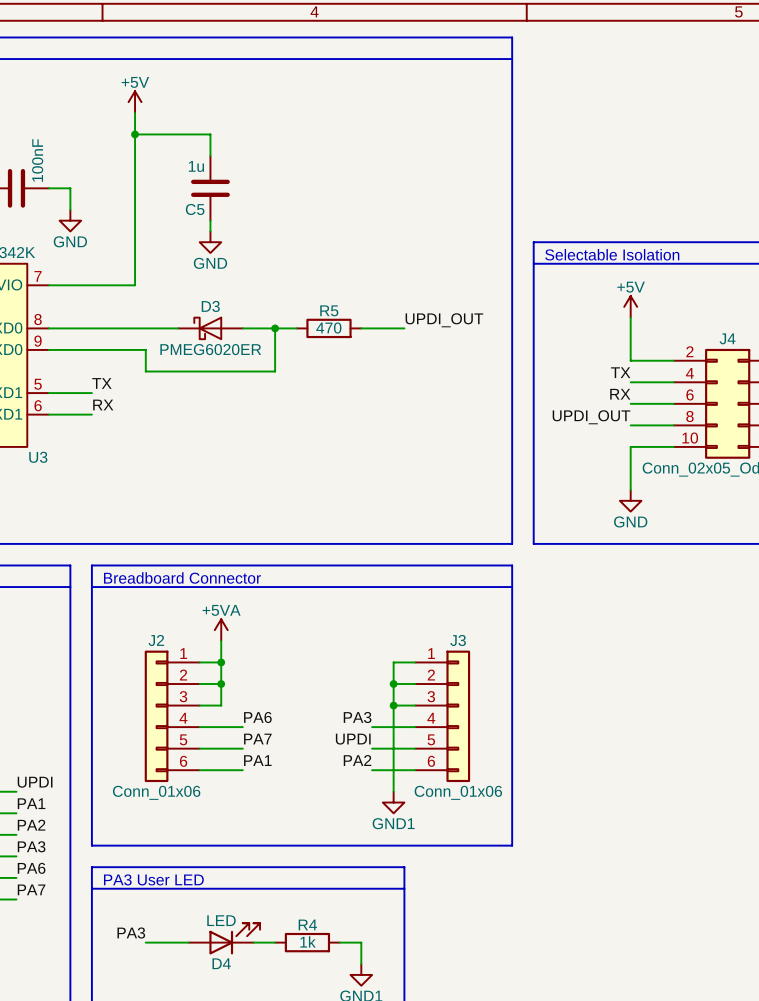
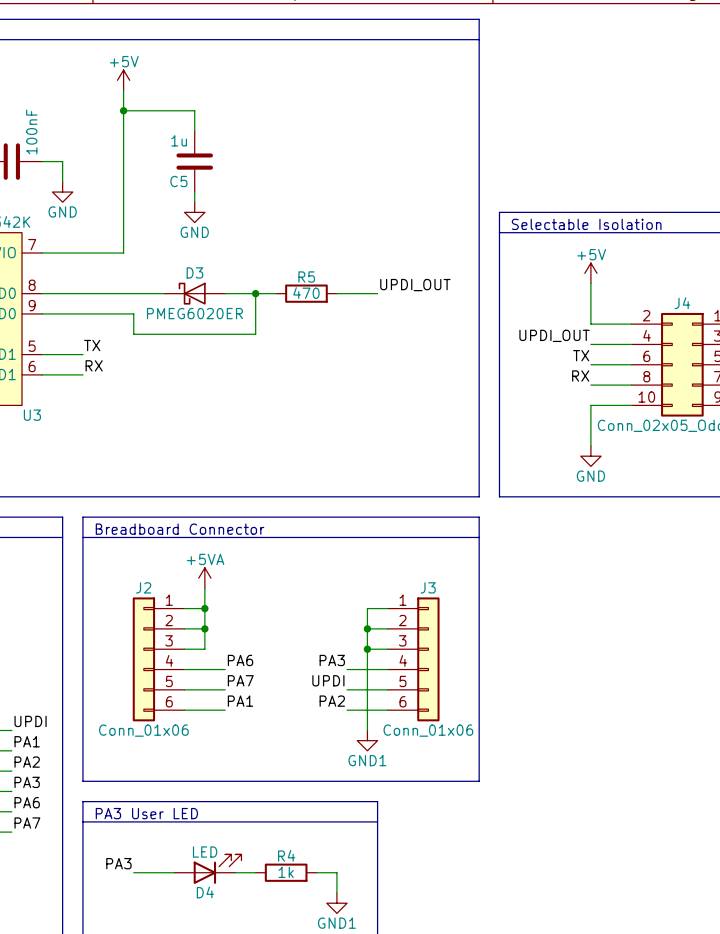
label: TX (620, 372) -> UPDI_OUT (554, 335)
label: RX (620, 394) -> TX (581, 355)
label: UPDI_OUT (591, 417) -> RX (580, 376)

